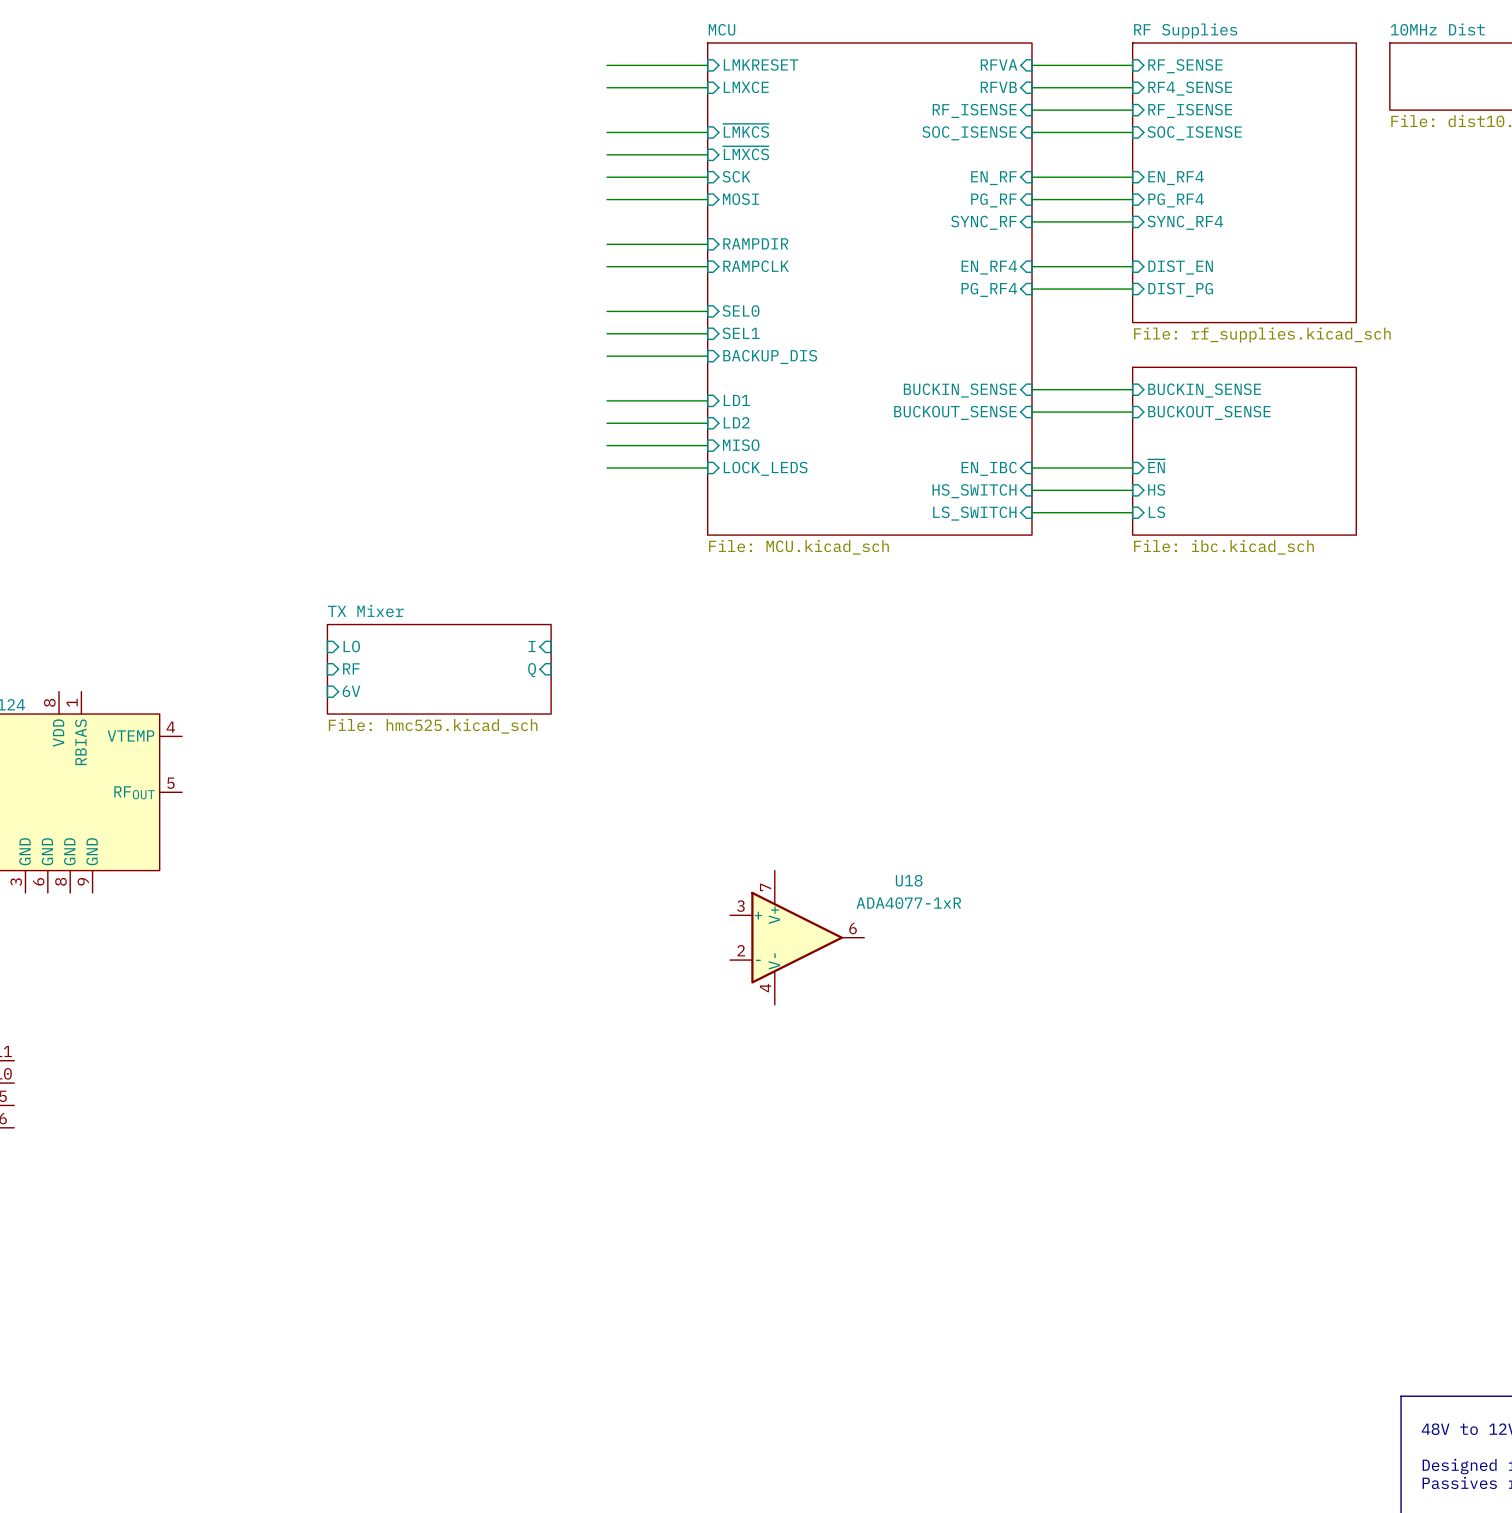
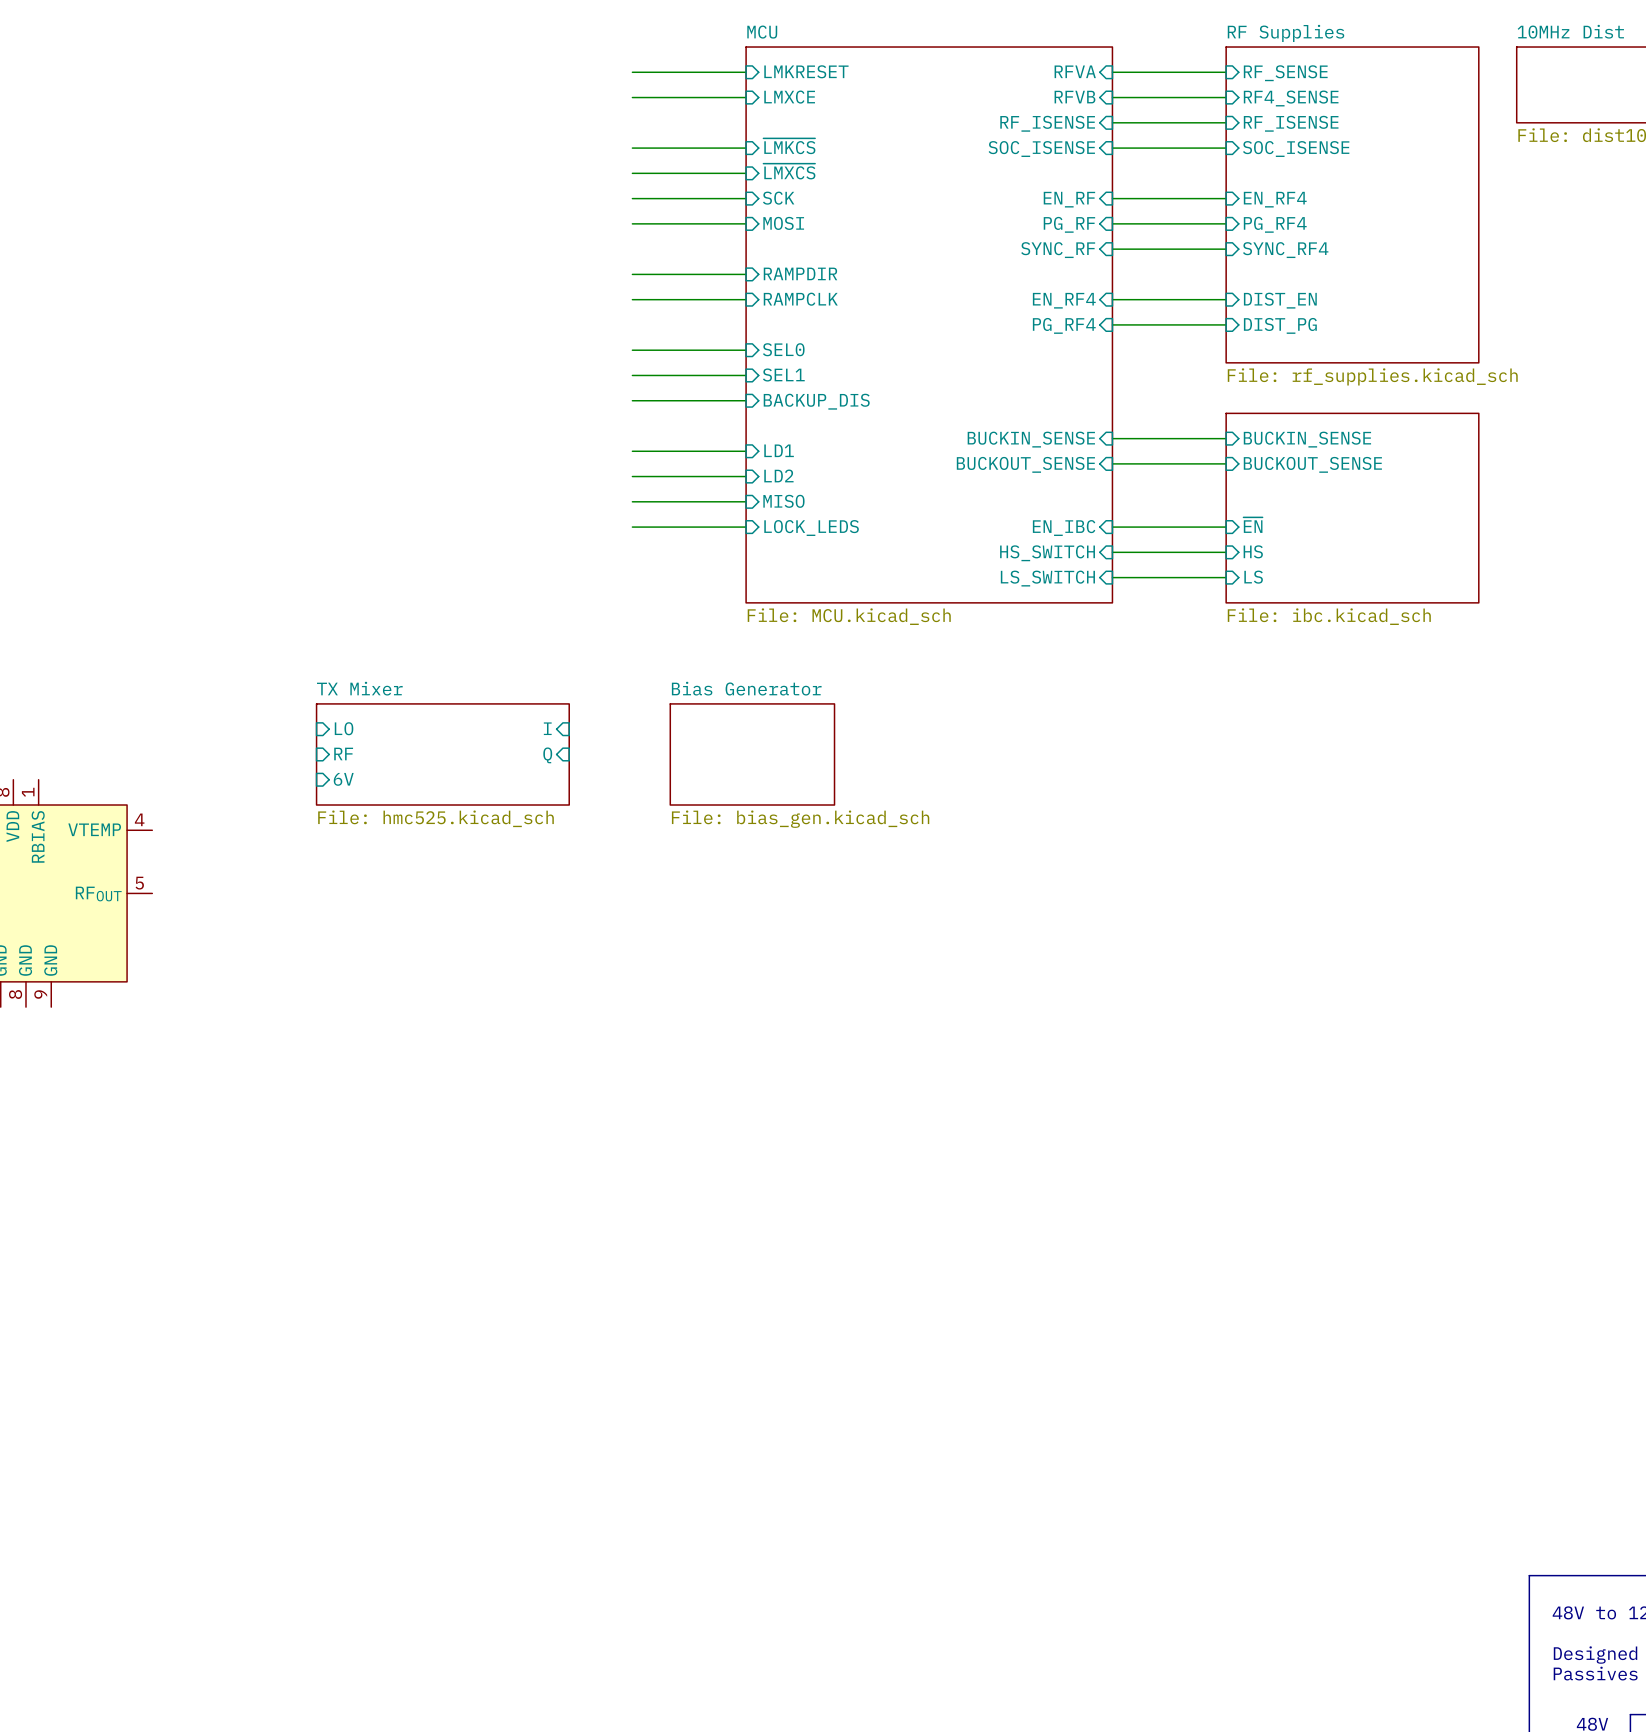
sheet Bias Generator: none -> File: bias_gen.kicad_sch (752, 754)
U18: ADA4077-1xR (797, 937) -> none

